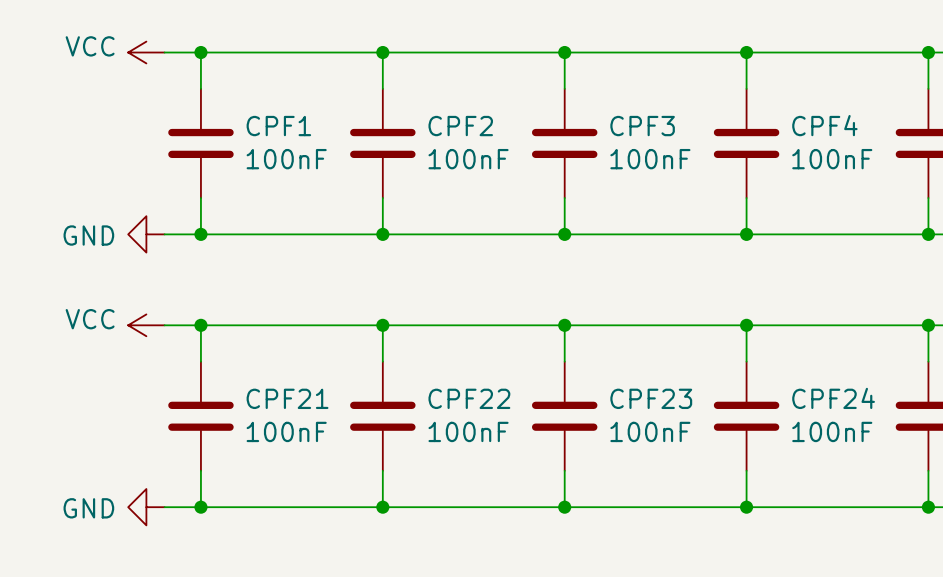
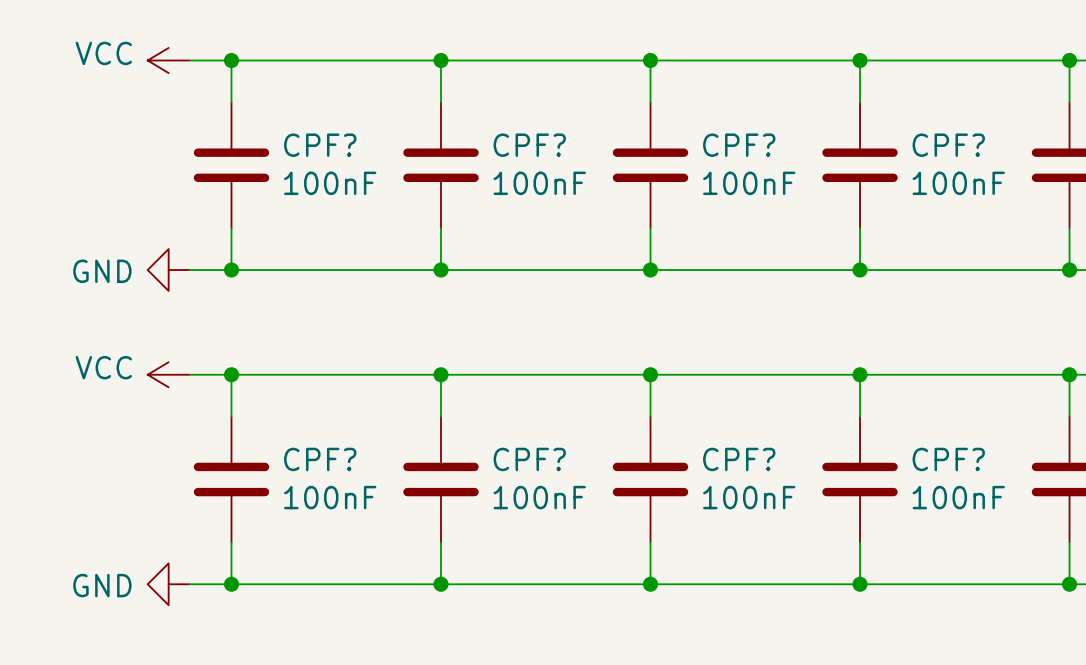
CPF4 name: CPF4 (824, 125) -> CPF? (948, 145)
CPF1 name: CPF1 (278, 126) -> CPF? (320, 145)
CPF2 name: CPF2 (460, 126) -> CPF? (529, 145)
CPF3 name: CPF3 (642, 126) -> CPF? (739, 145)
CPF21 name: CPF21 (287, 398) -> CPF? (320, 459)
CPF22 name: CPF22 (469, 398) -> CPF? (529, 459)
CPF23 name: CPF23 (651, 398) -> CPF? (739, 459)
CPF24 name: CPF24 (833, 398) -> CPF? (948, 459)

